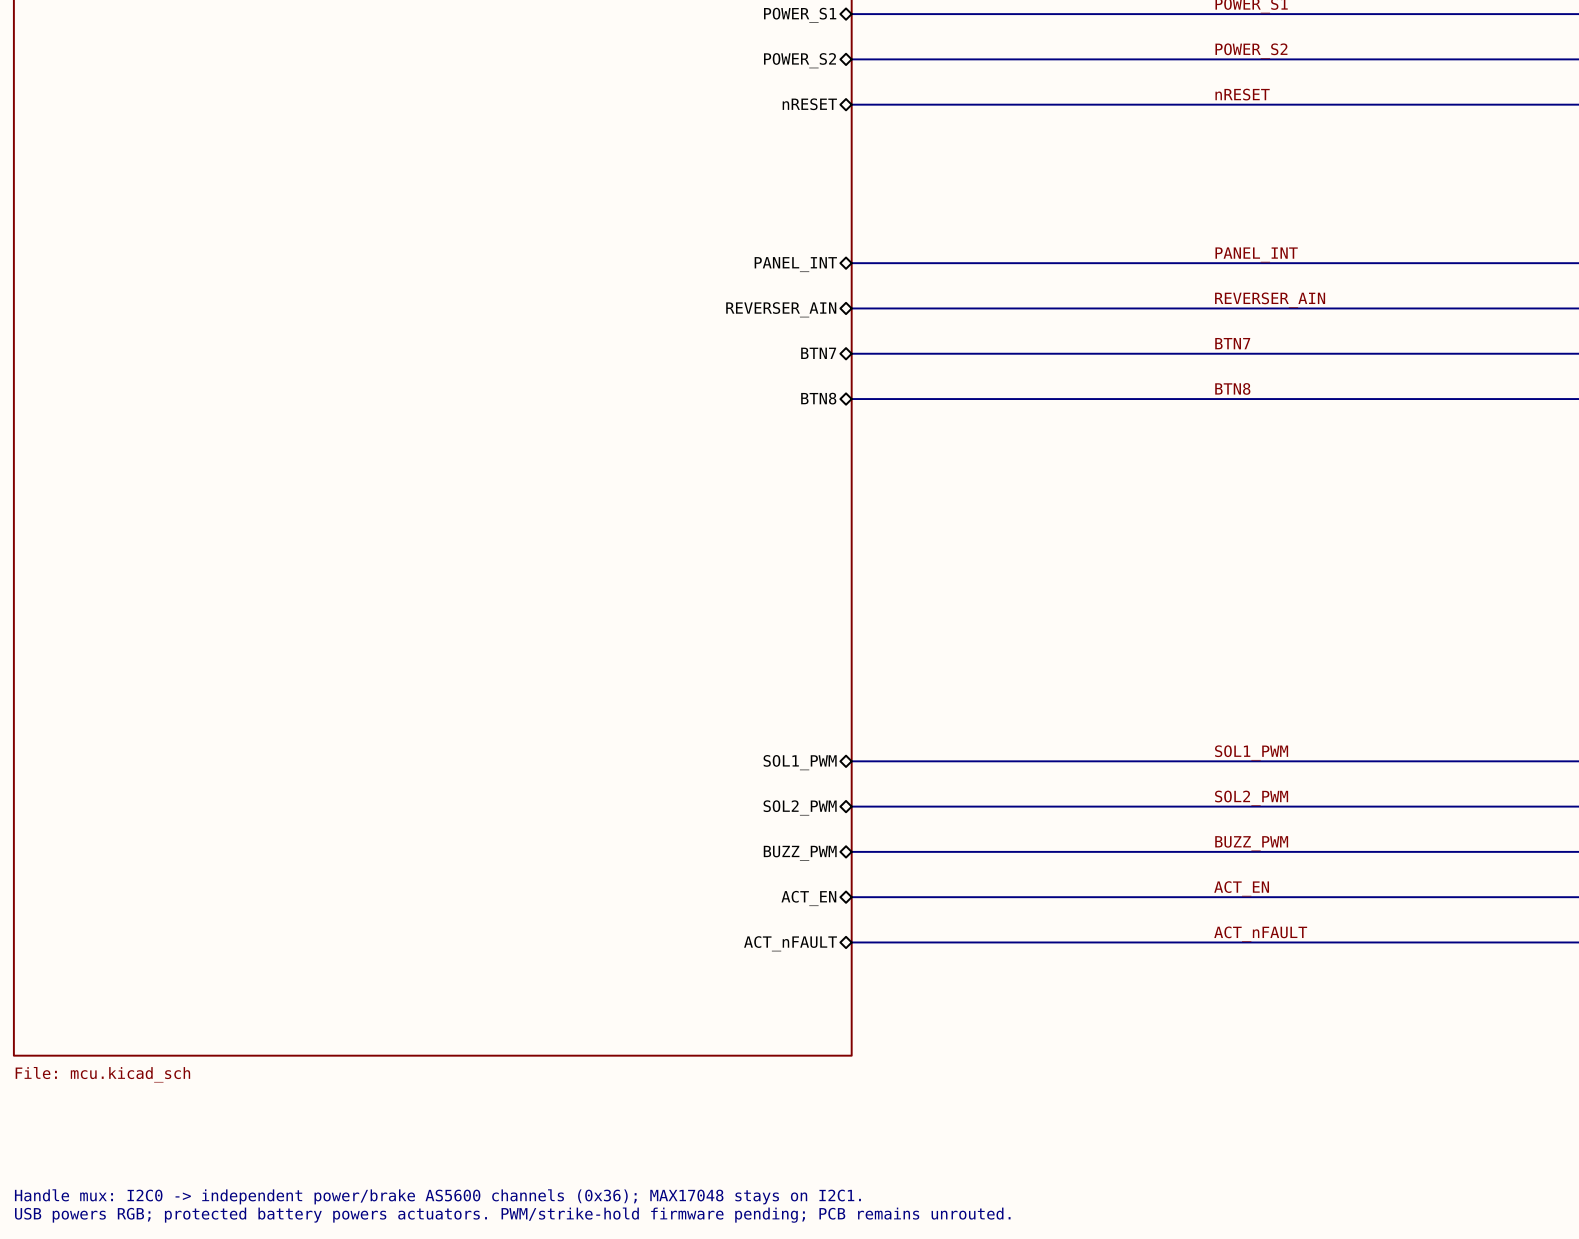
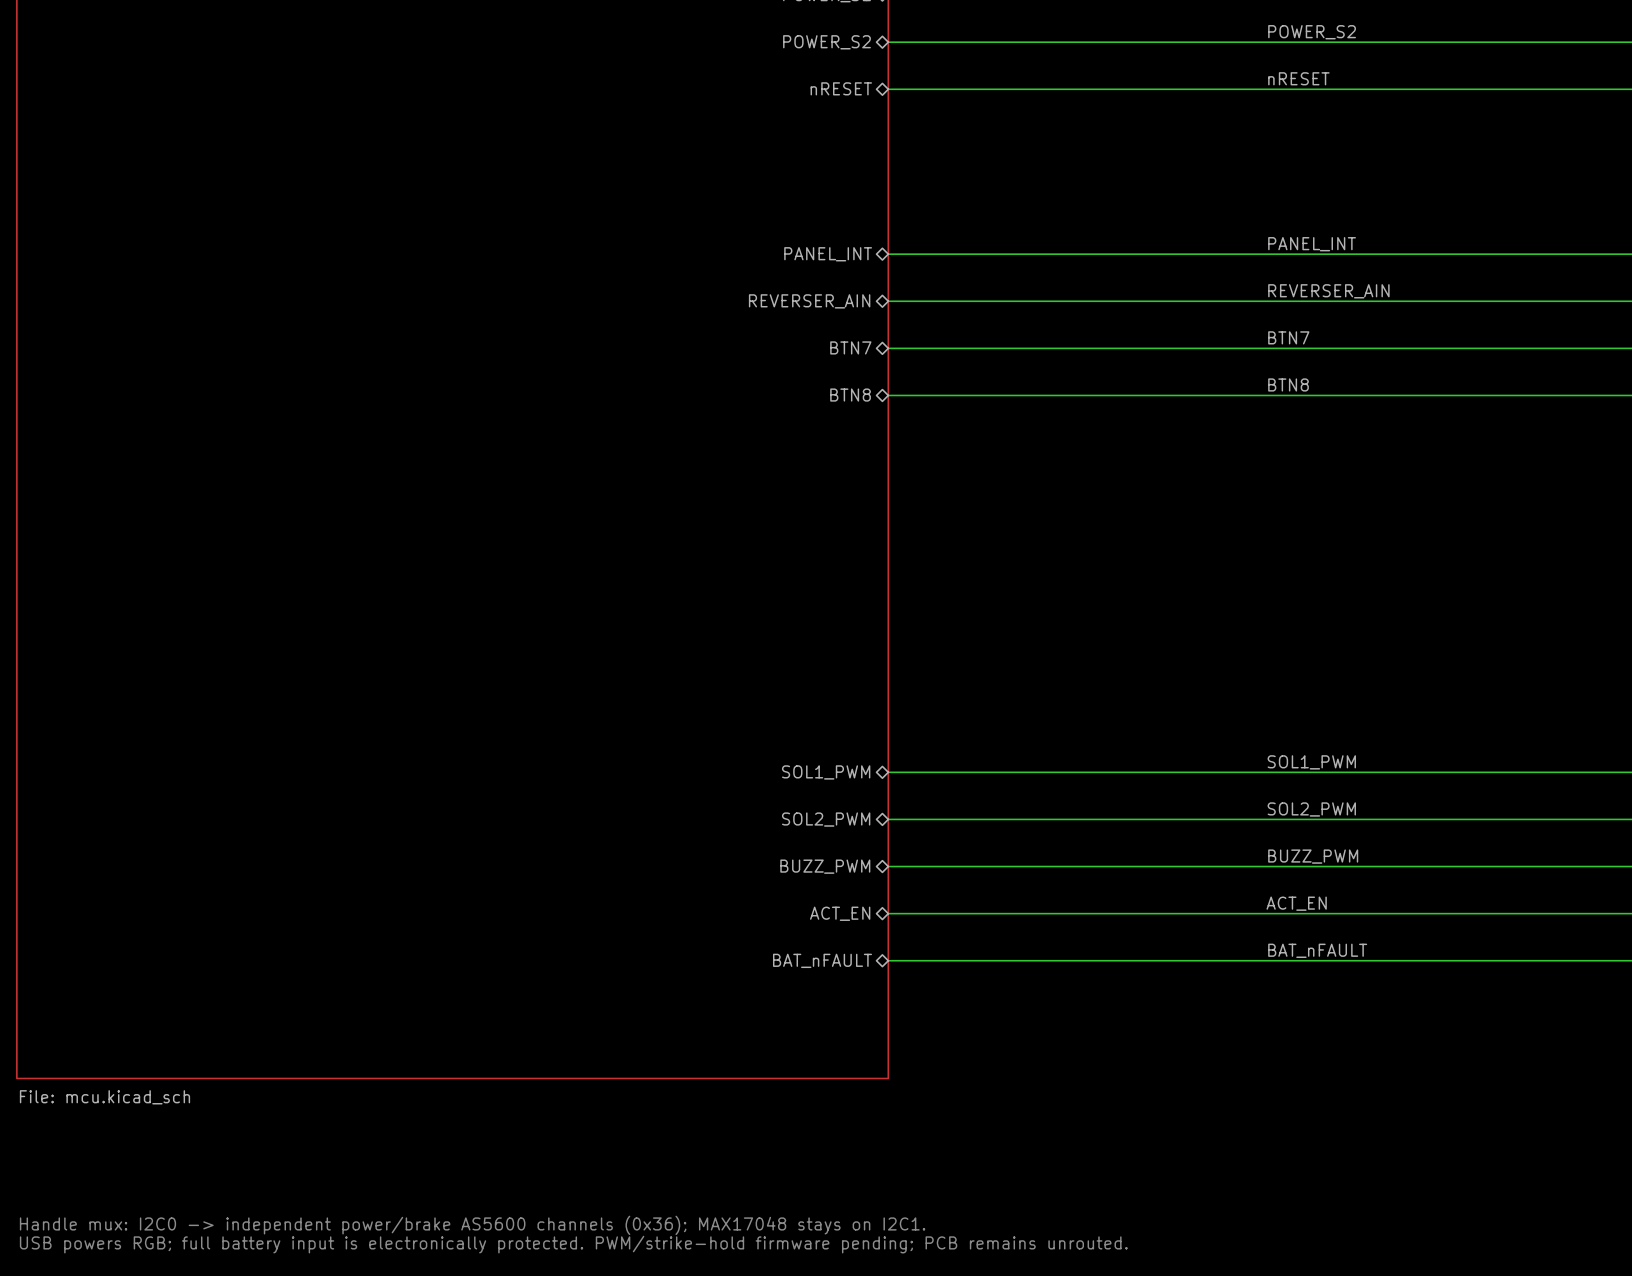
label: ACT_nFAULT (1260, 934) -> BAT_nFAULT (1317, 950)
sheet pin: ACT_nFAULT (790, 943) -> BAT_nFAULT (822, 960)
text: USB powers RGB; protected battery powers actuators. PWM/strike-hold firmware pending; PCB remains unrouted. (512, 1215) -> USB powers RGB; full battery input is electronically protected. PWM/strike-hold firmware pending; PCB remains unrouted. (573, 1244)

